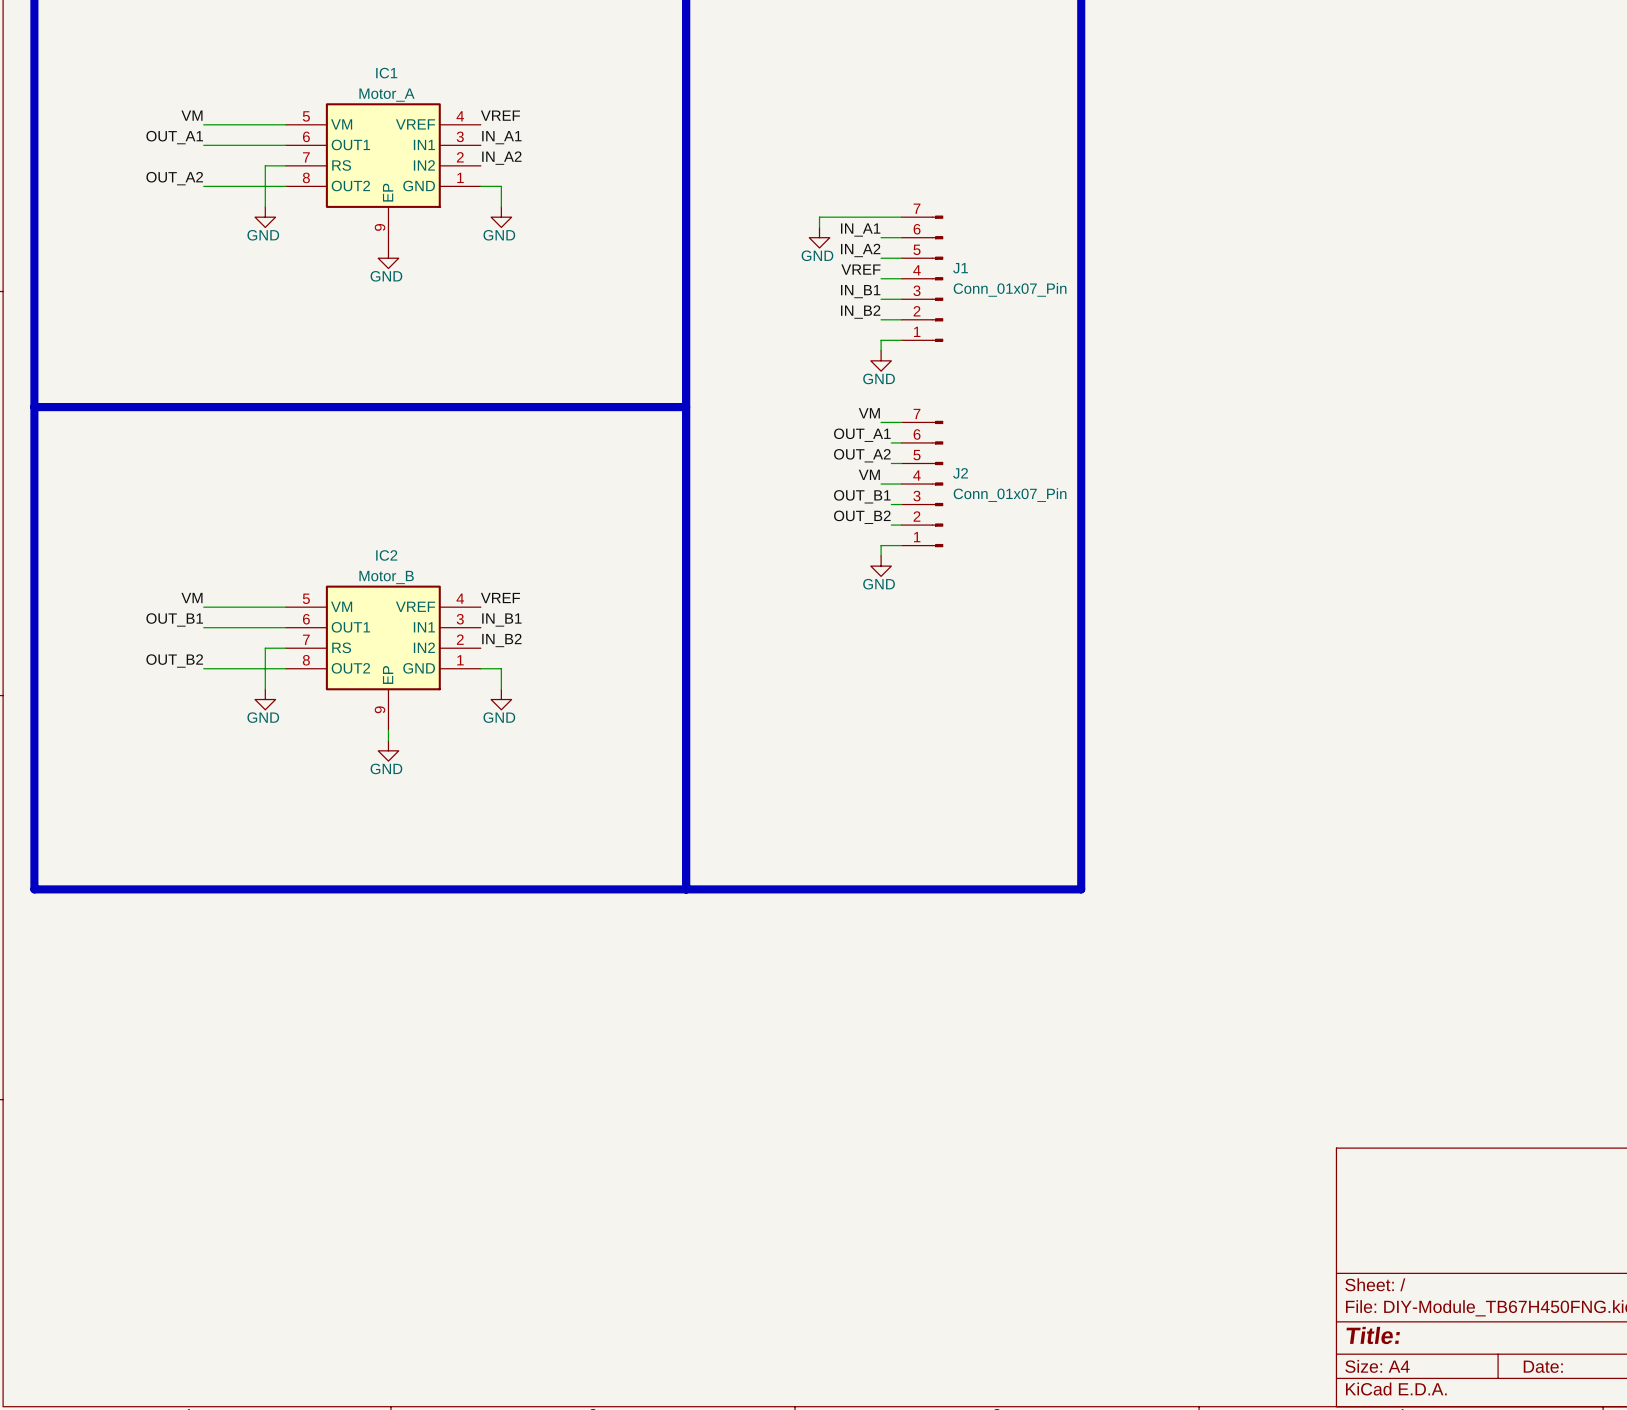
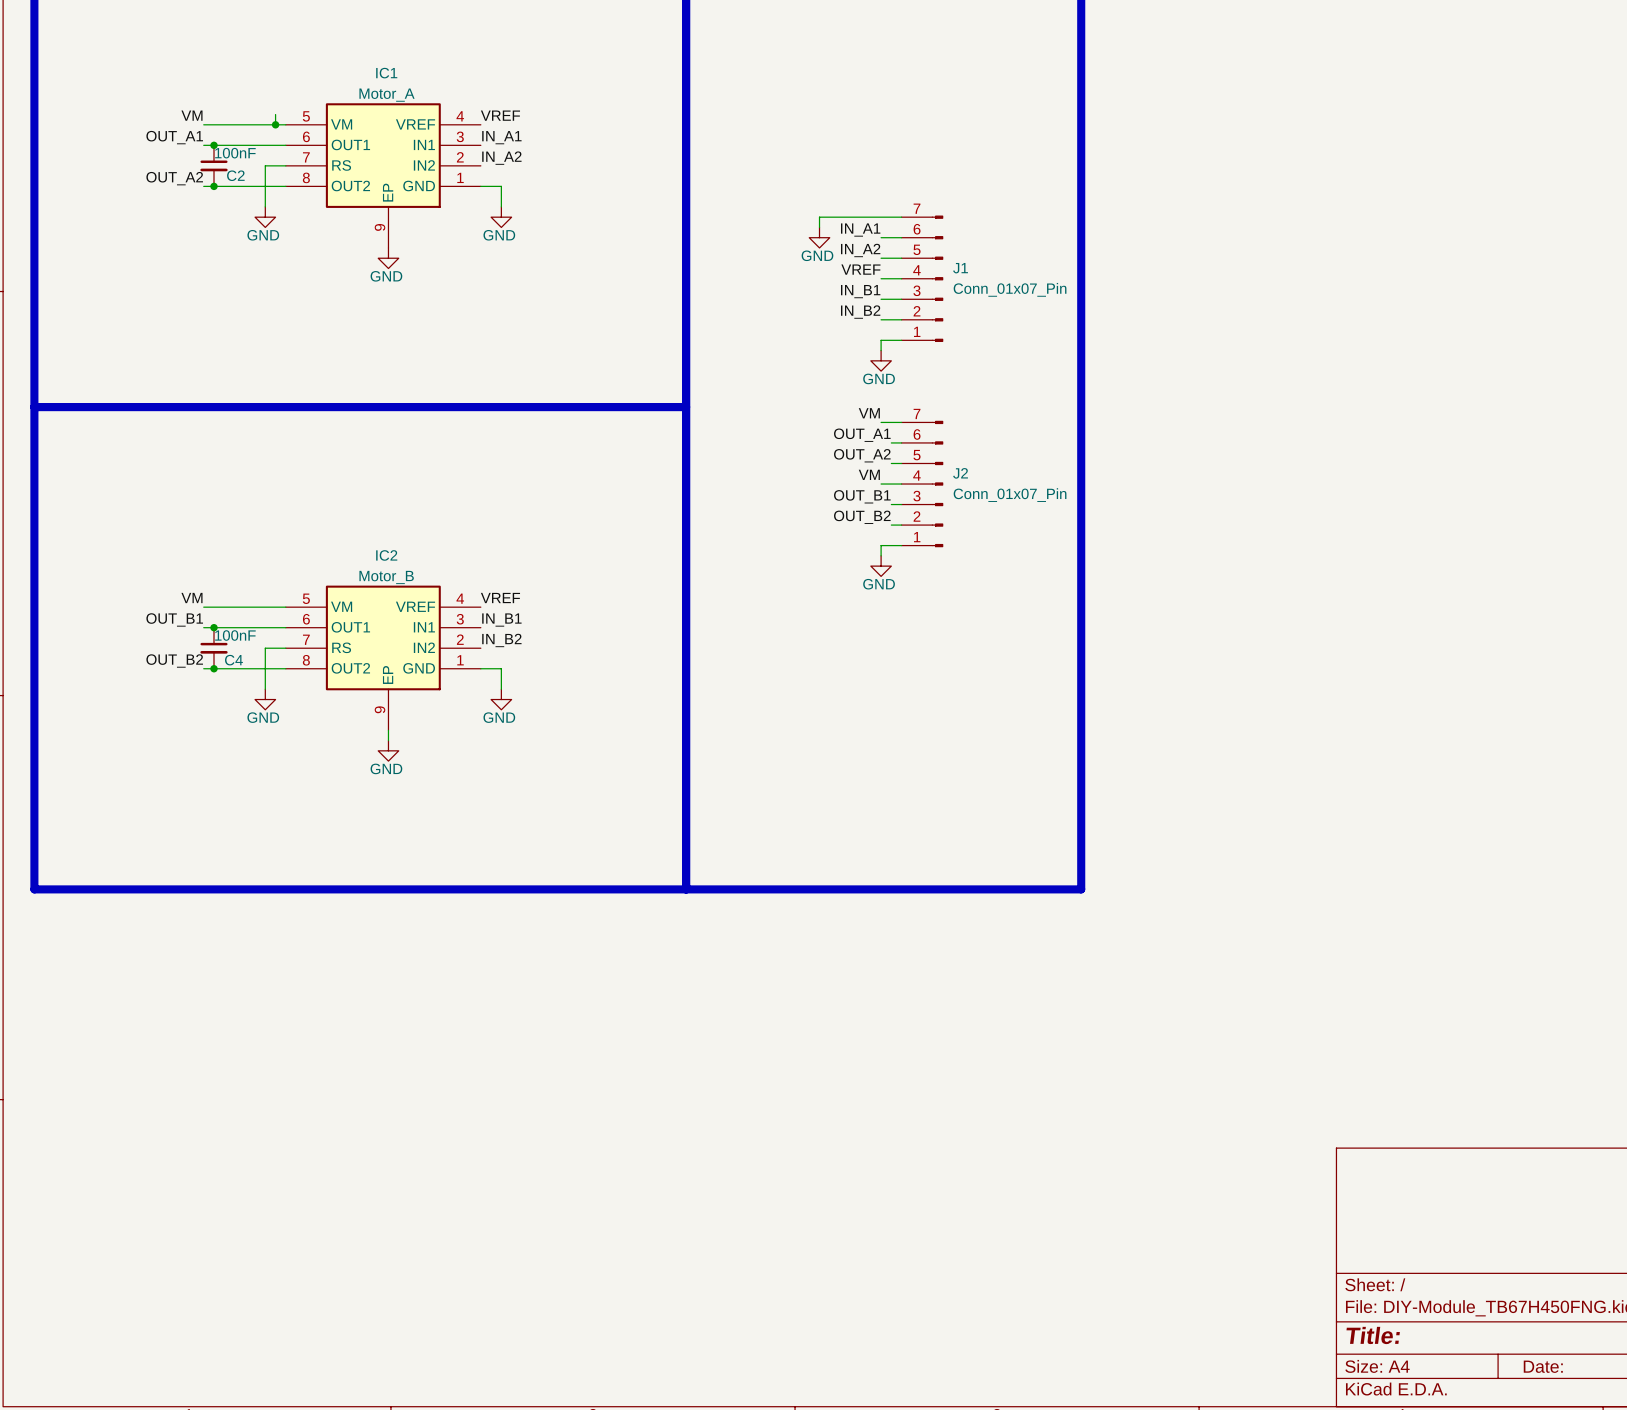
wire: none -> (275, 114) (275, 124)
junction: none -> (275, 124)
junction: none -> (214, 145)
C2: none -> 100nF (214, 165)
junction: none -> (214, 186)
junction: none -> (214, 627)
C4: none -> 100nF (214, 648)
junction: none -> (214, 668)

